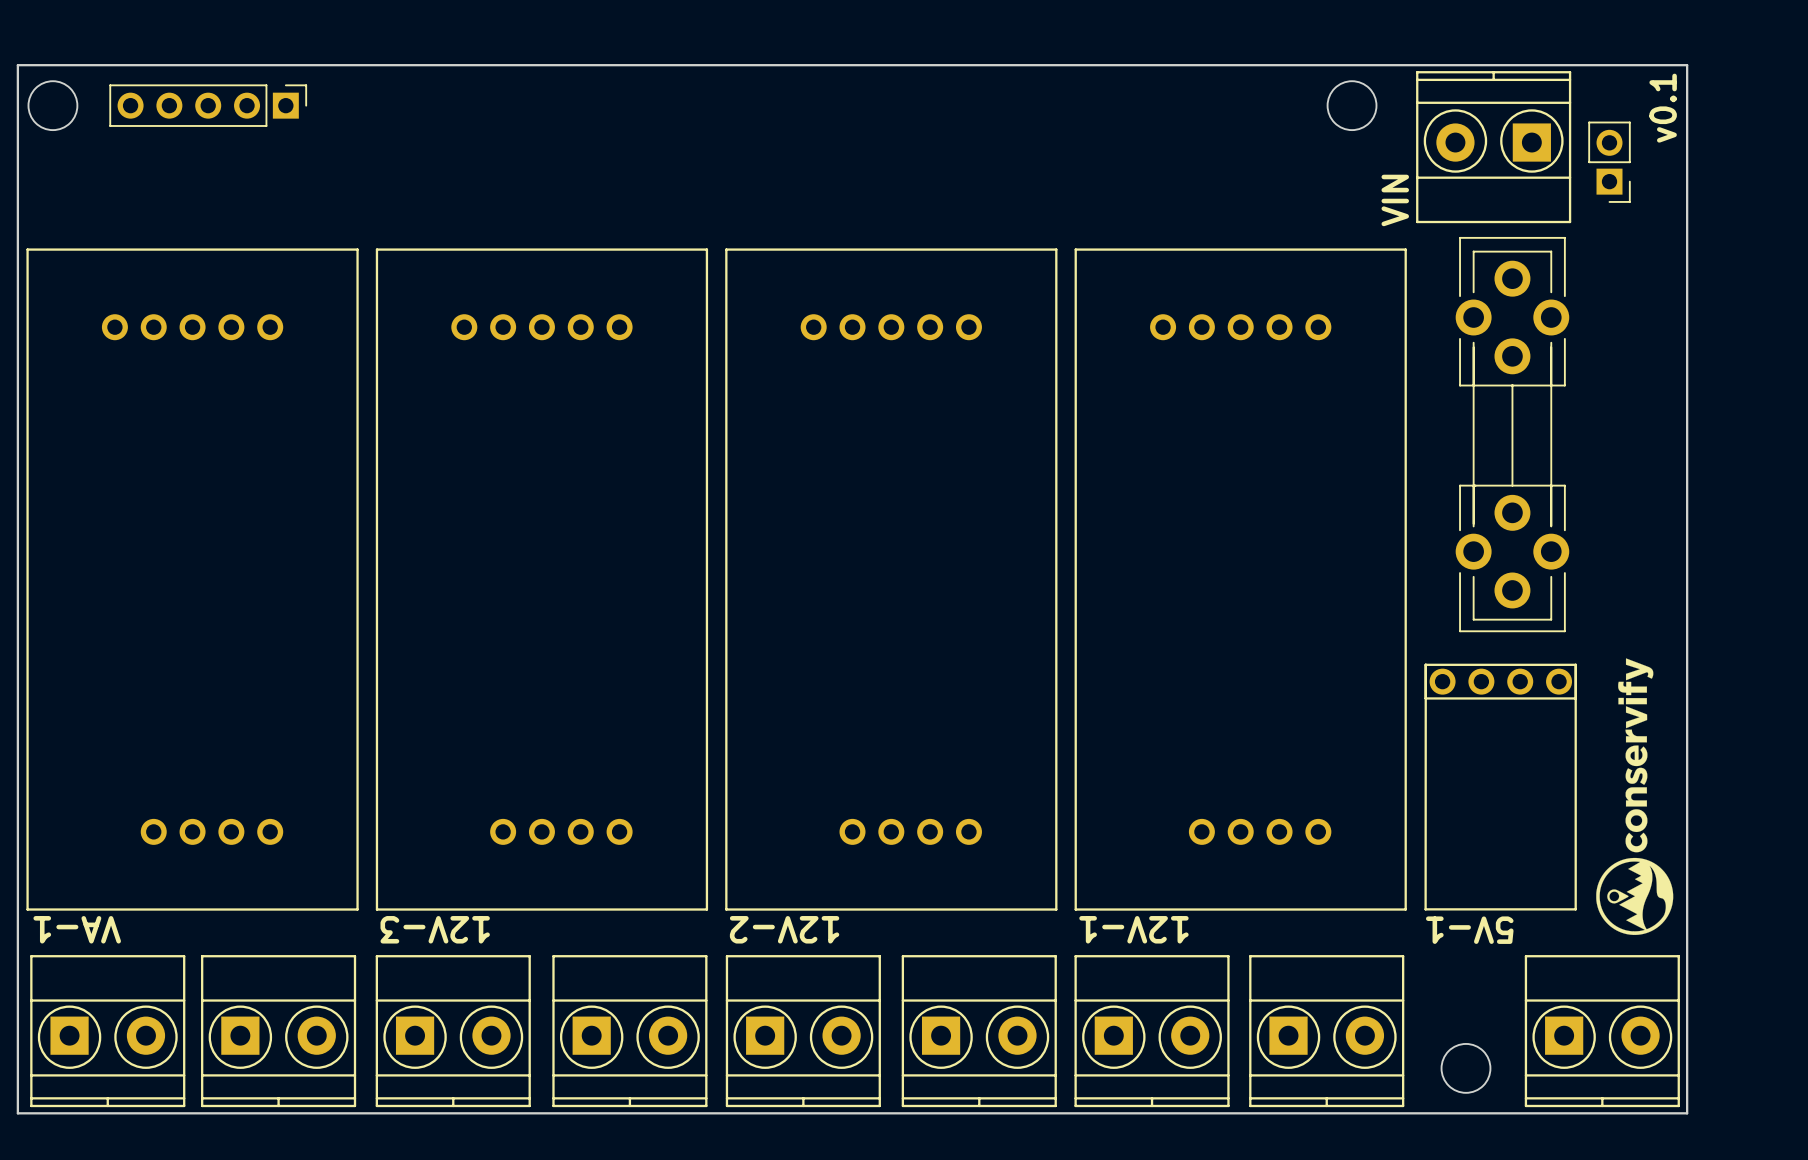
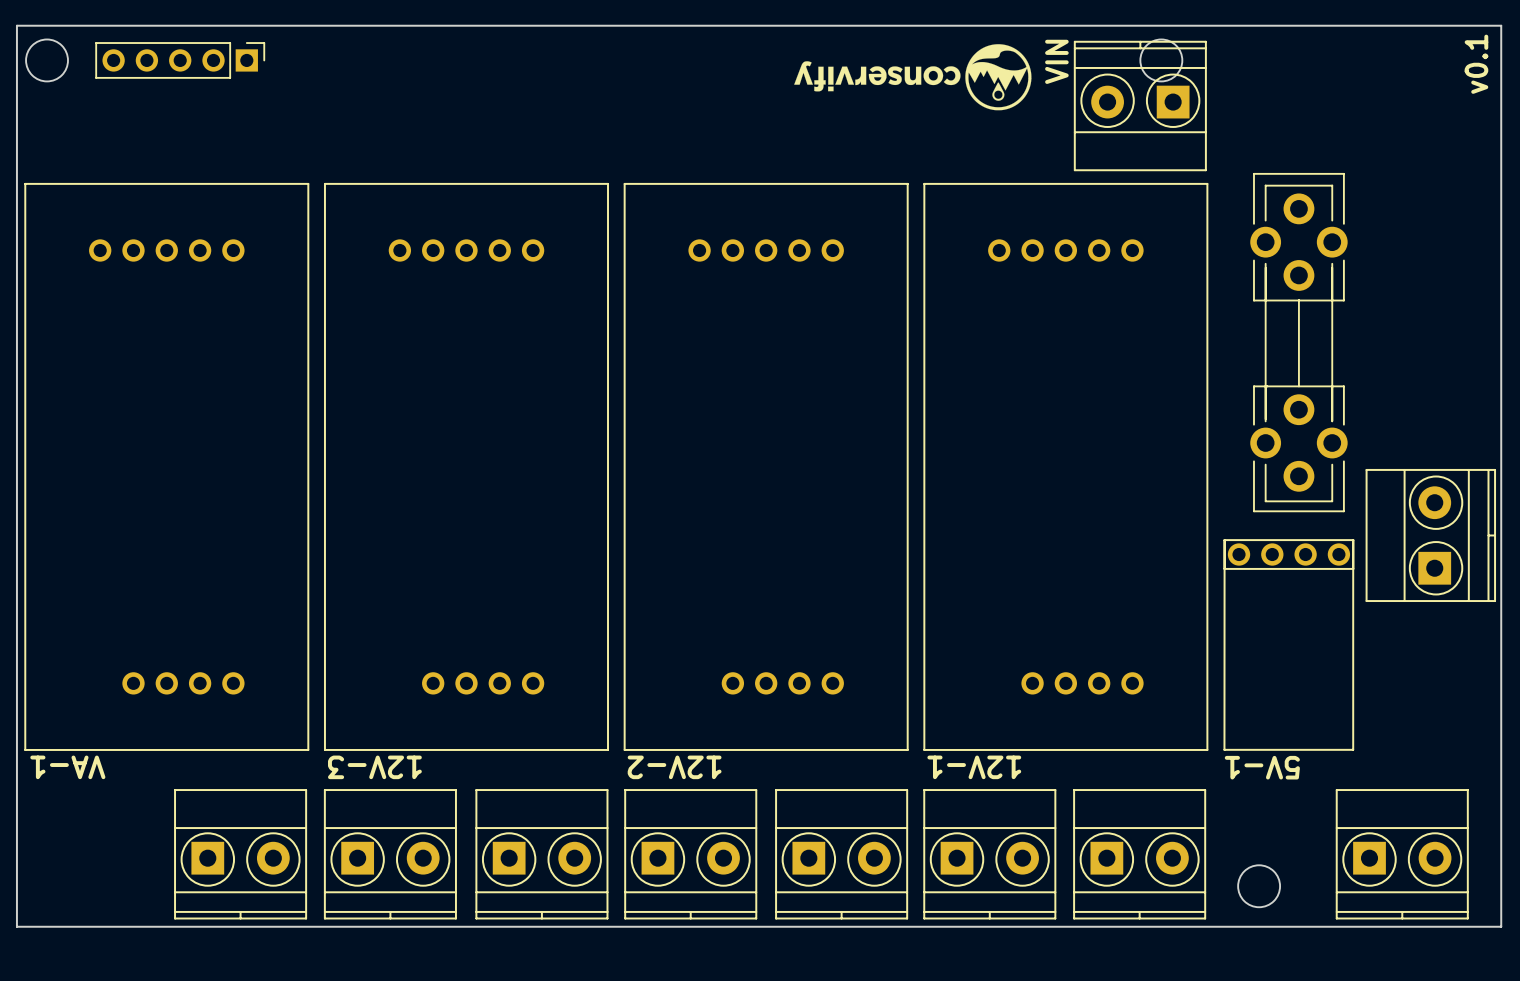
board edge: (1687, 65) (1687, 1113) (17, 1113) -> (1448, 25) (1501, 25) (1501, 926) (16, 926) (16, 924)
drawing: none -> [794, 44, 1032, 111]
text position: v0.1 (1663, 108) -> v0.1 (1476, 64)
part position: (1493, 147) -> (1140, 106)
part: (1609, 162) -> none
text position: VIN (1395, 200) -> VIN (1056, 61)
drawing: [1596, 658, 1674, 935] -> none
part: none -> (1430, 535)
part: (107, 1031) -> none
part position: (1602, 1031) -> (1402, 854)

